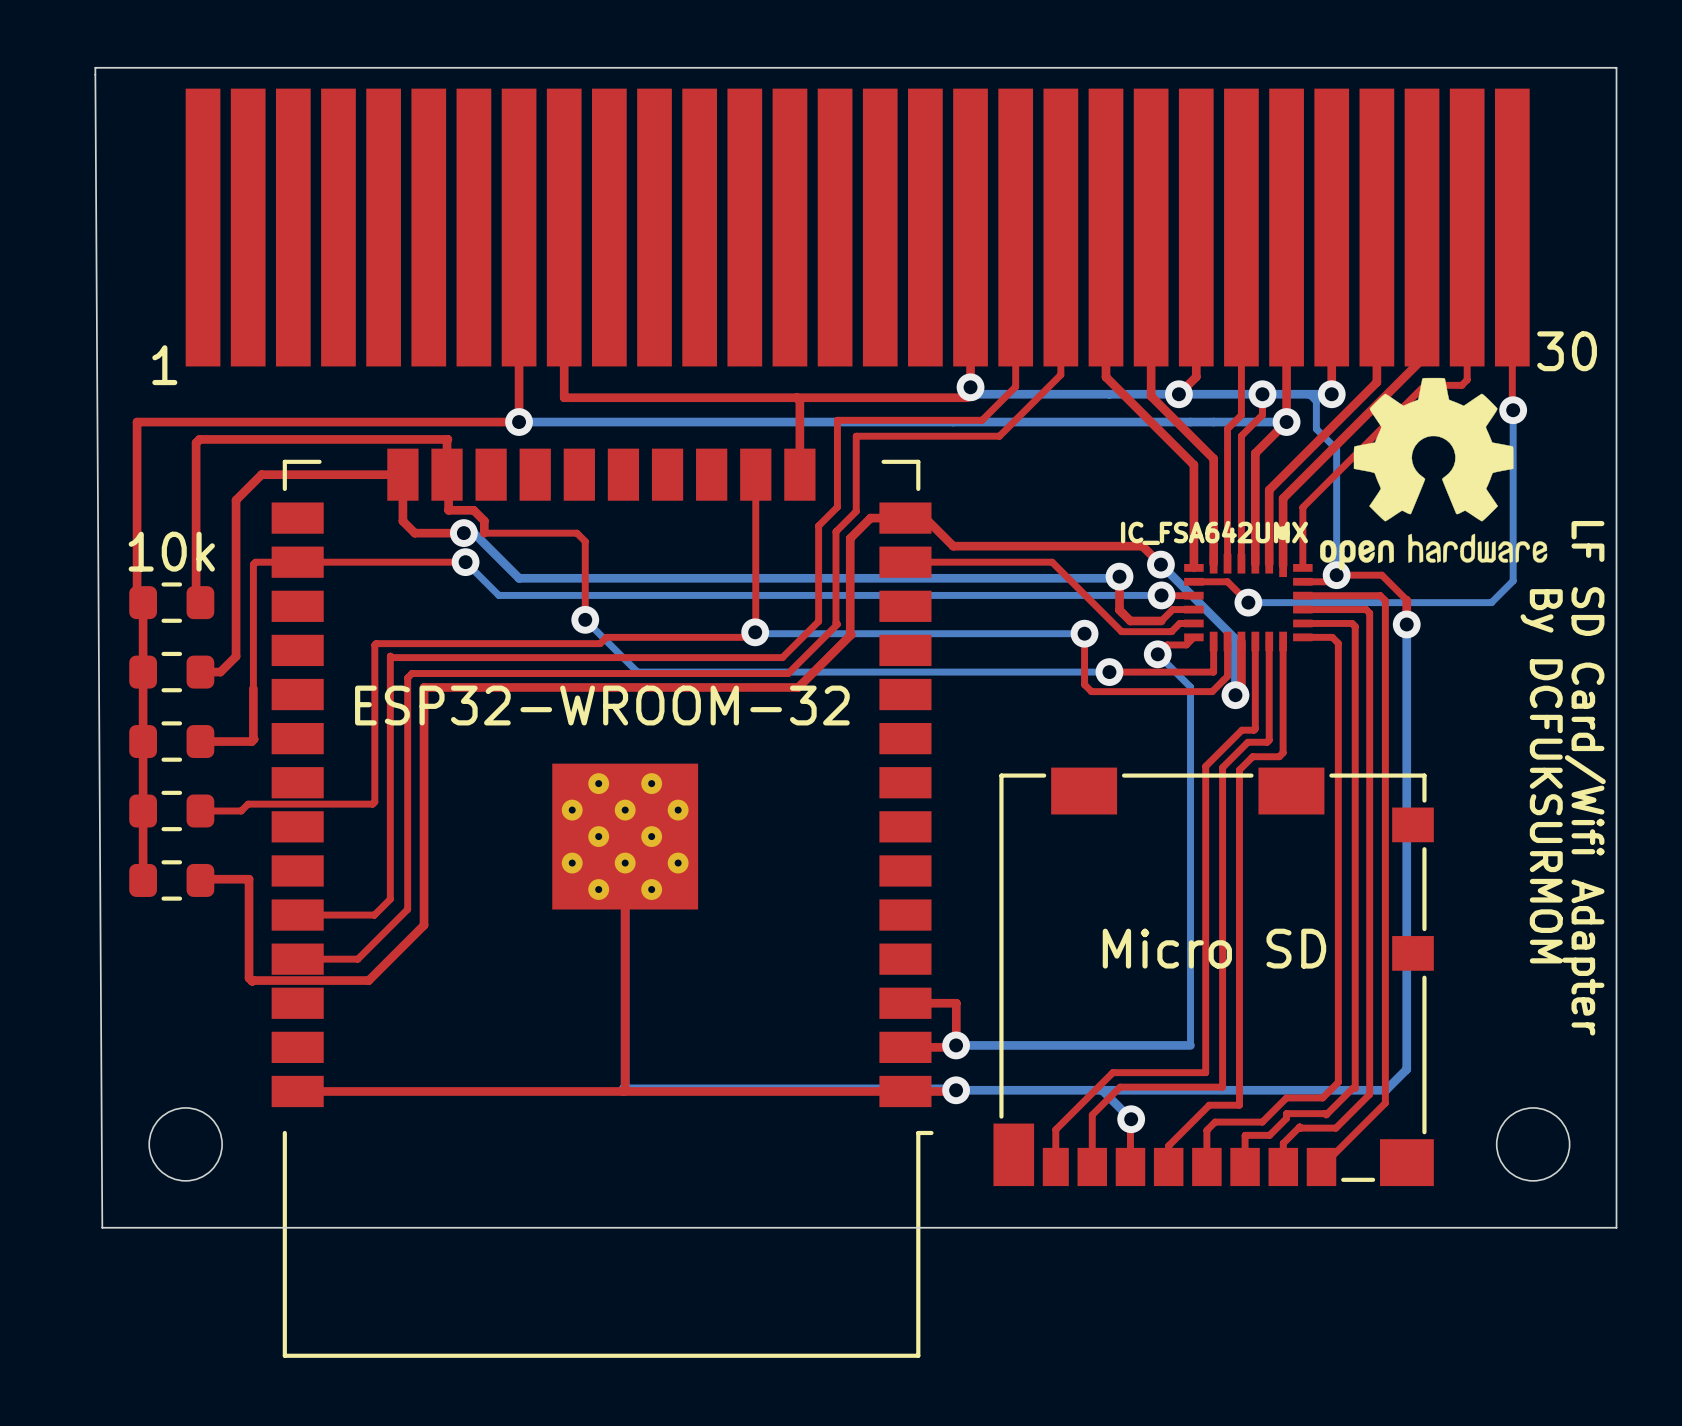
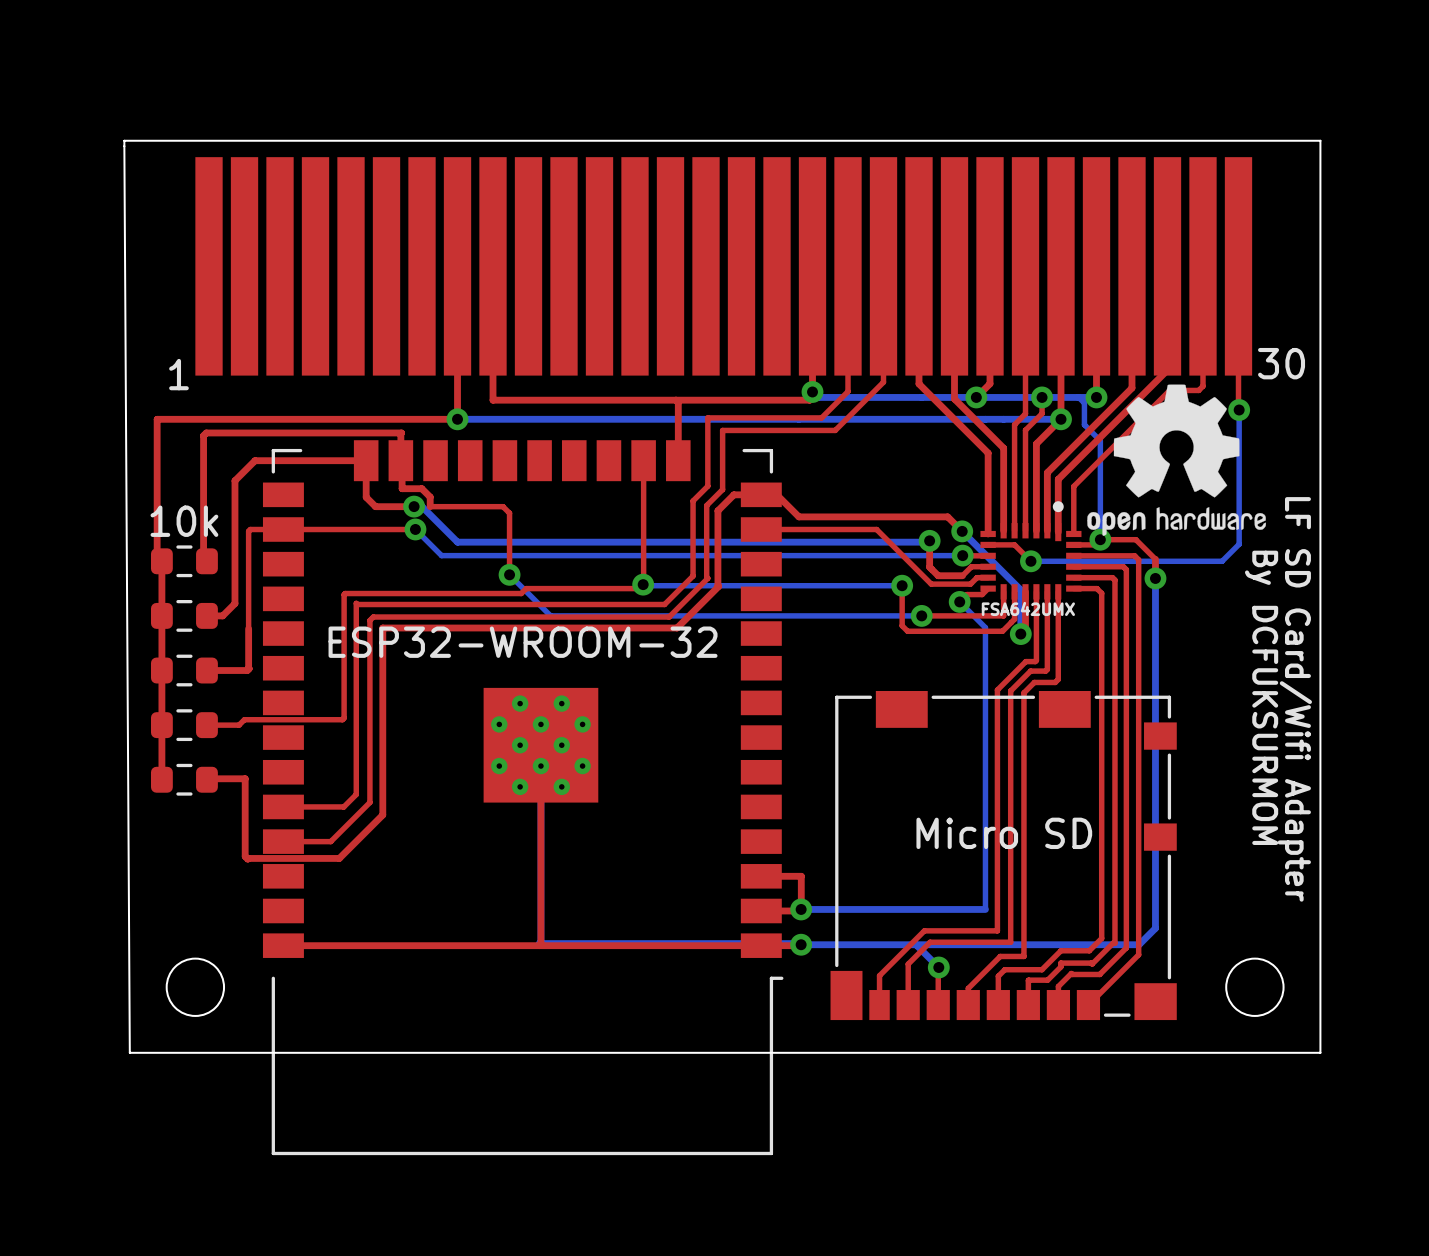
part value: IC_FSA642UMX (1214, 532) -> FSA642UMX (1028, 608)

